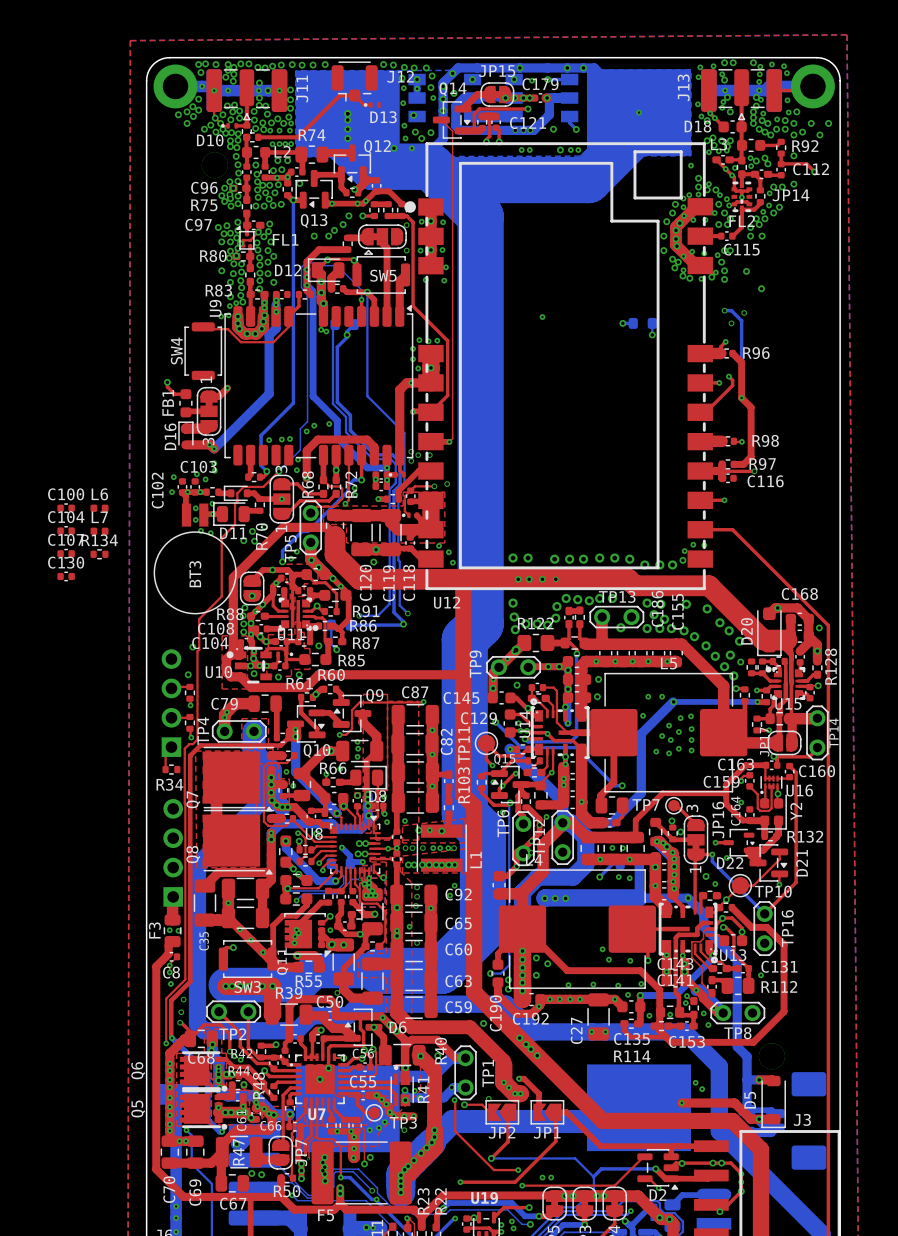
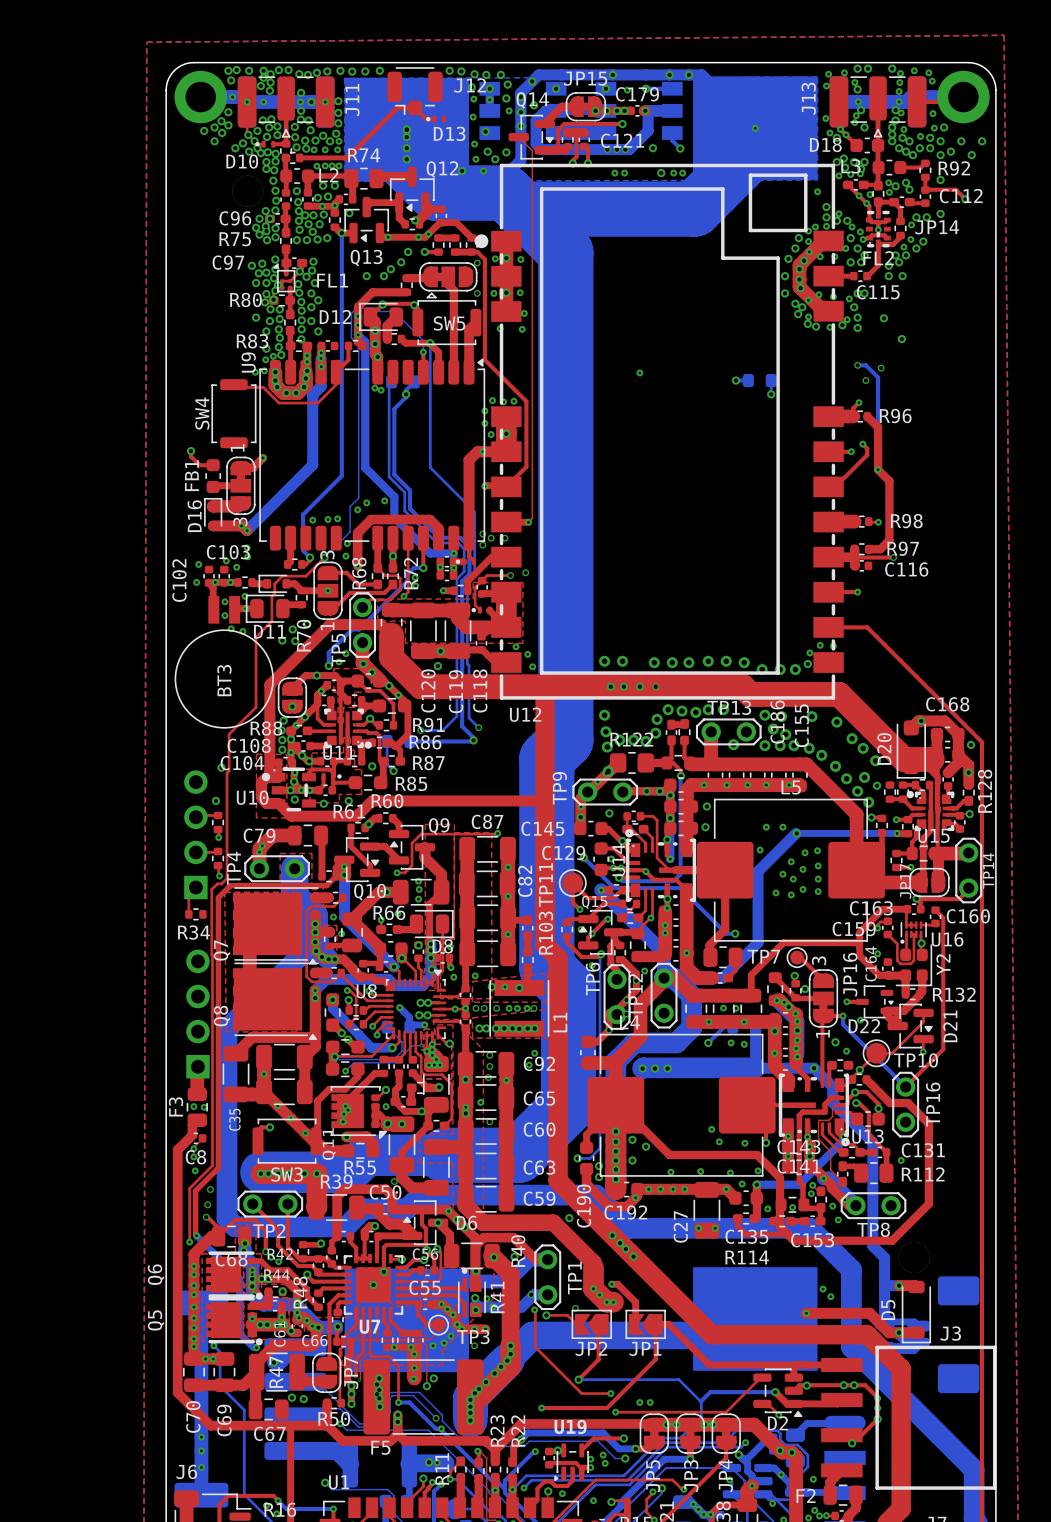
C100: (66, 508) -> none
L6: (99, 508) -> none
C104: (66, 530) -> none
L7: (99, 531) -> none
C107: (66, 553) -> none
R134: (99, 554) -> none
C130: (66, 576) -> none

